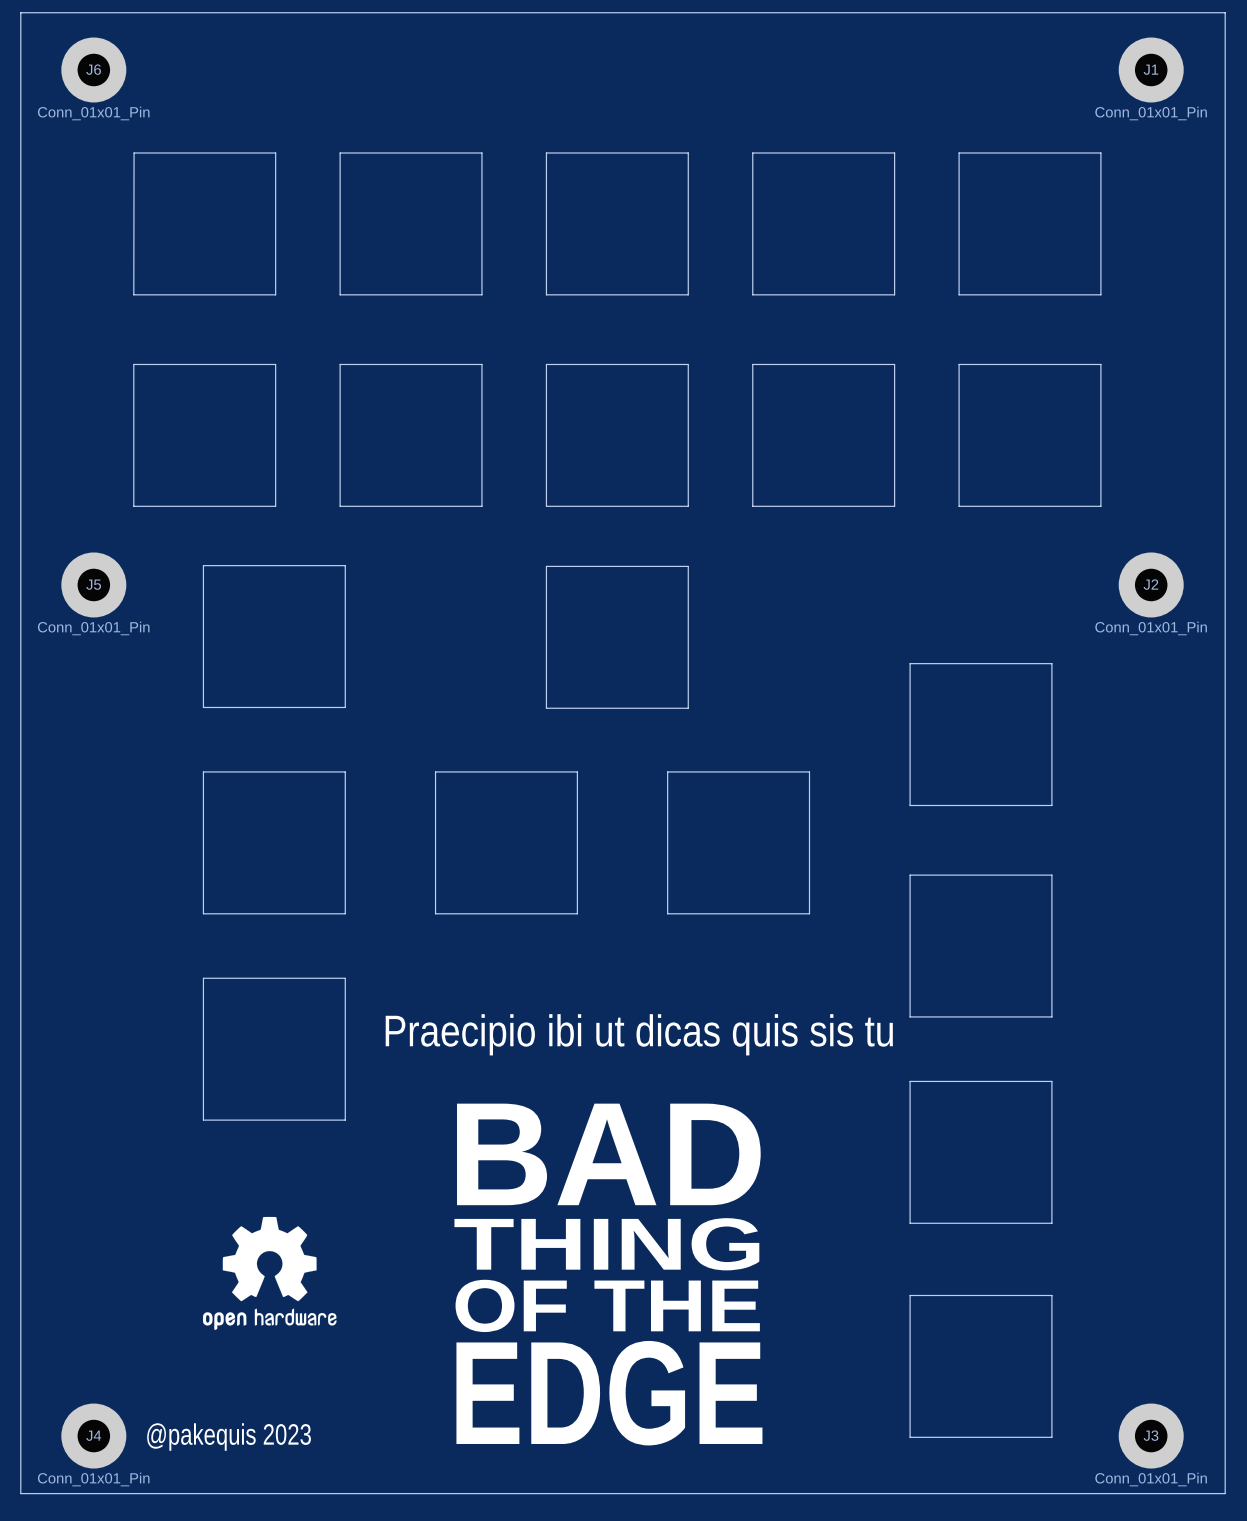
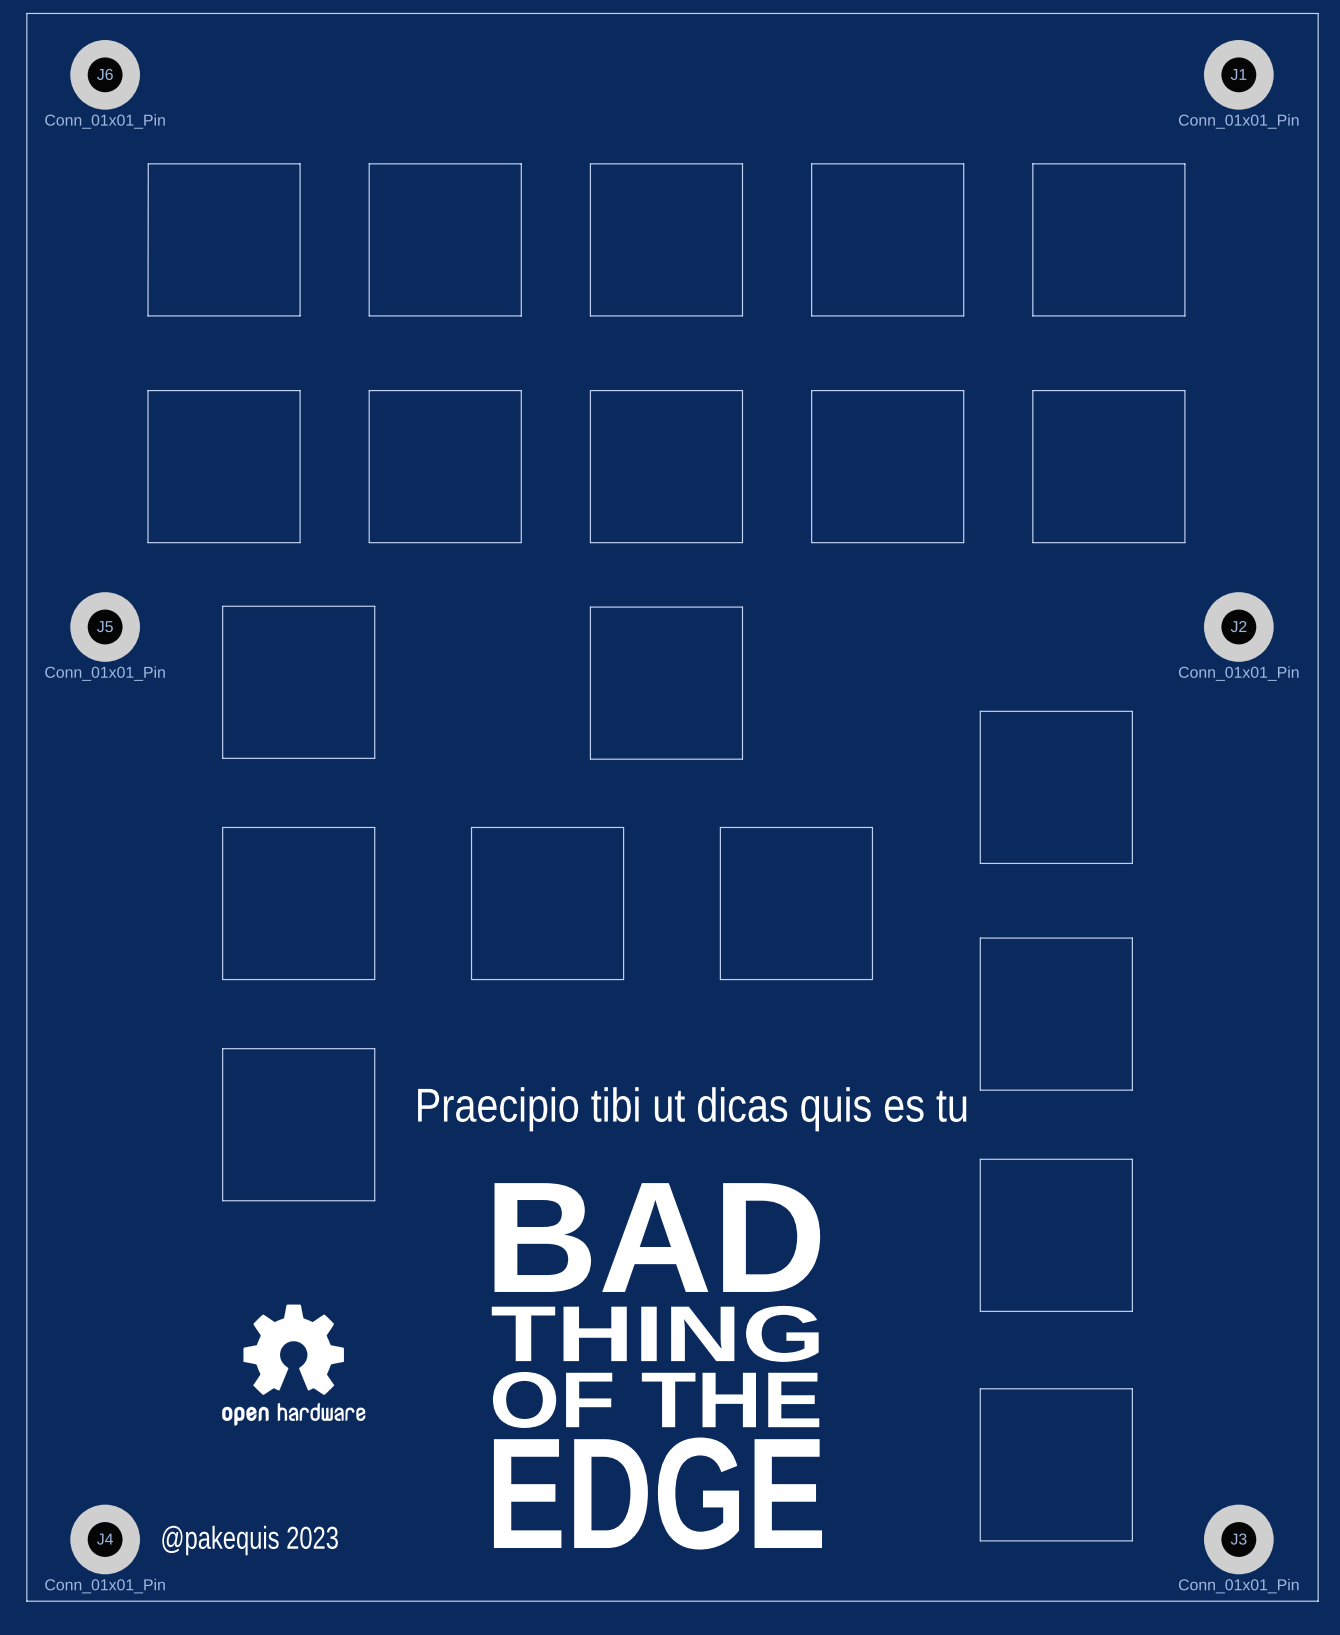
text: Praecipio ibi ut dicas quis sis tu (639, 1034) -> Praecipio tibi ut dicas quis es tu (692, 1109)

